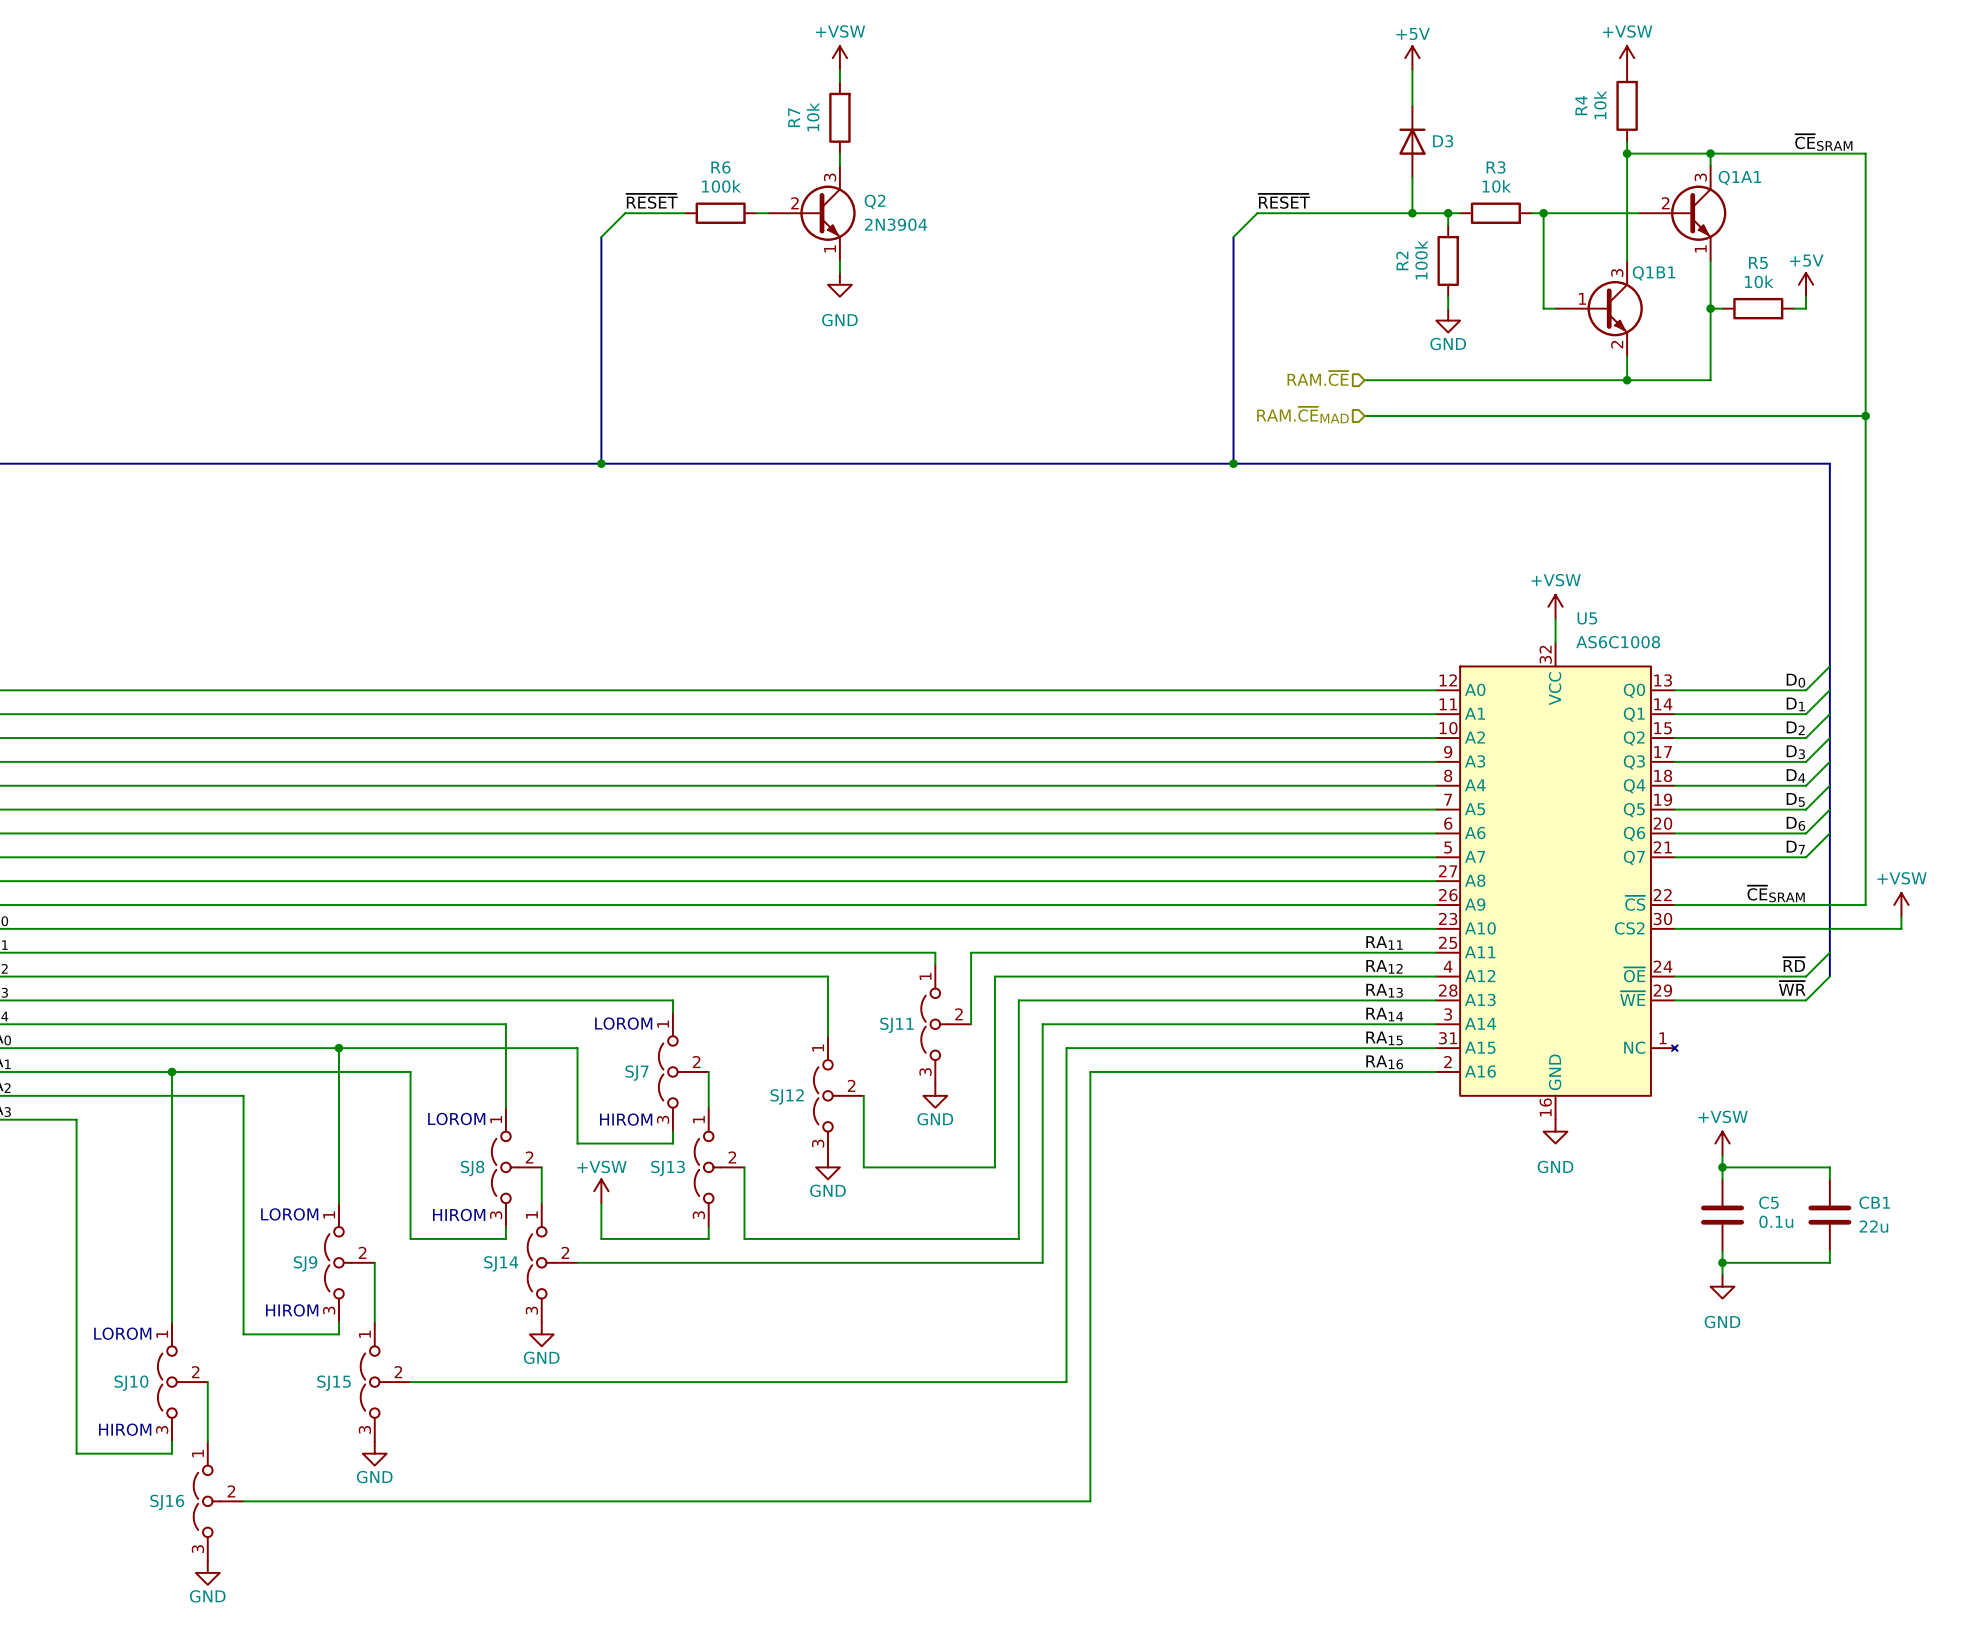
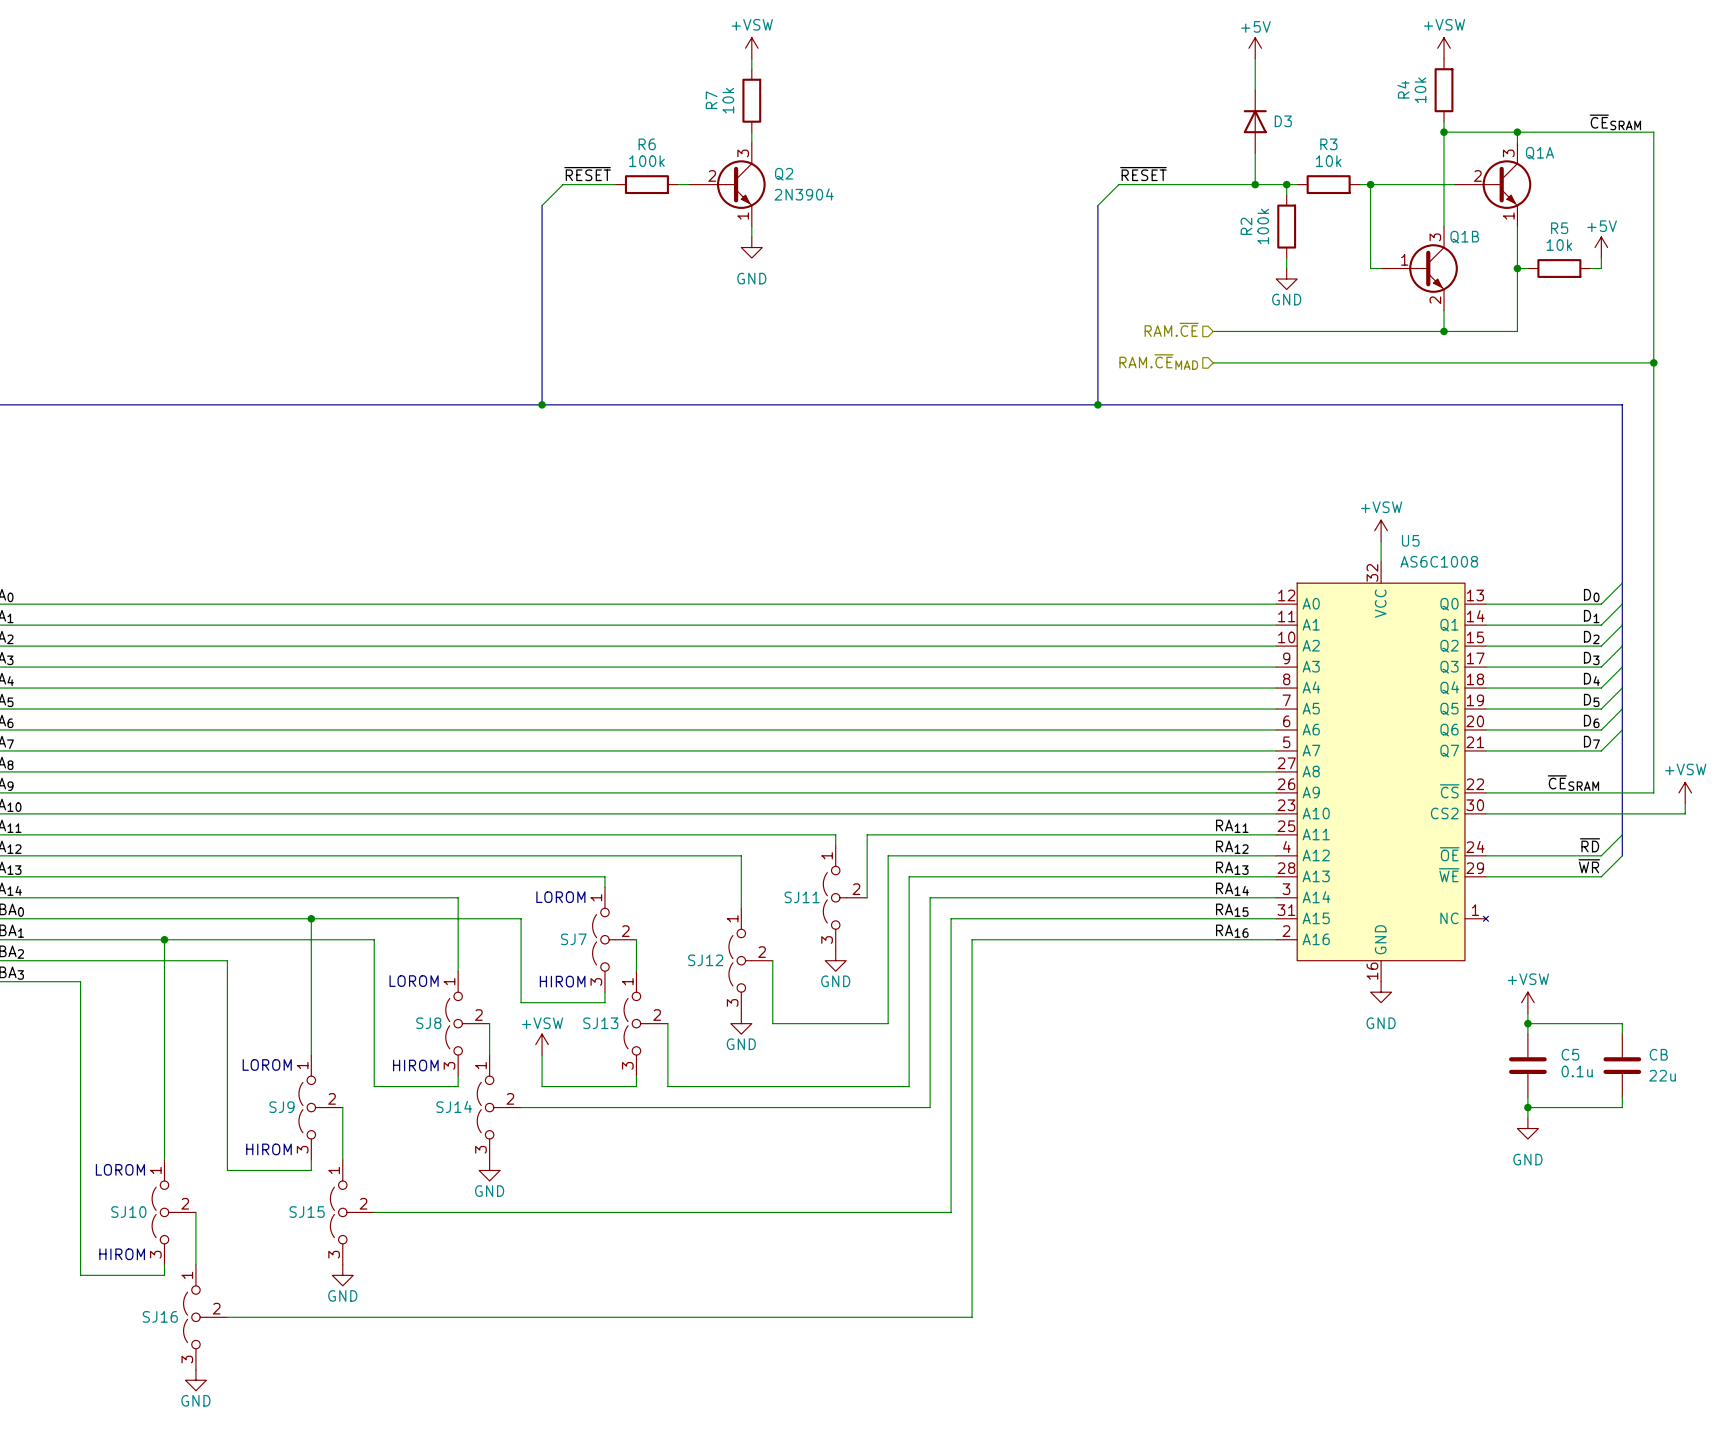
Q1A1 name: Q1A1 (1739, 177) -> Q1A (1540, 153)
Q1B1 name: Q1B1 (1654, 273) -> Q1B (1464, 237)
CB1 name: CB1 (1874, 1202) -> CB (1658, 1054)

